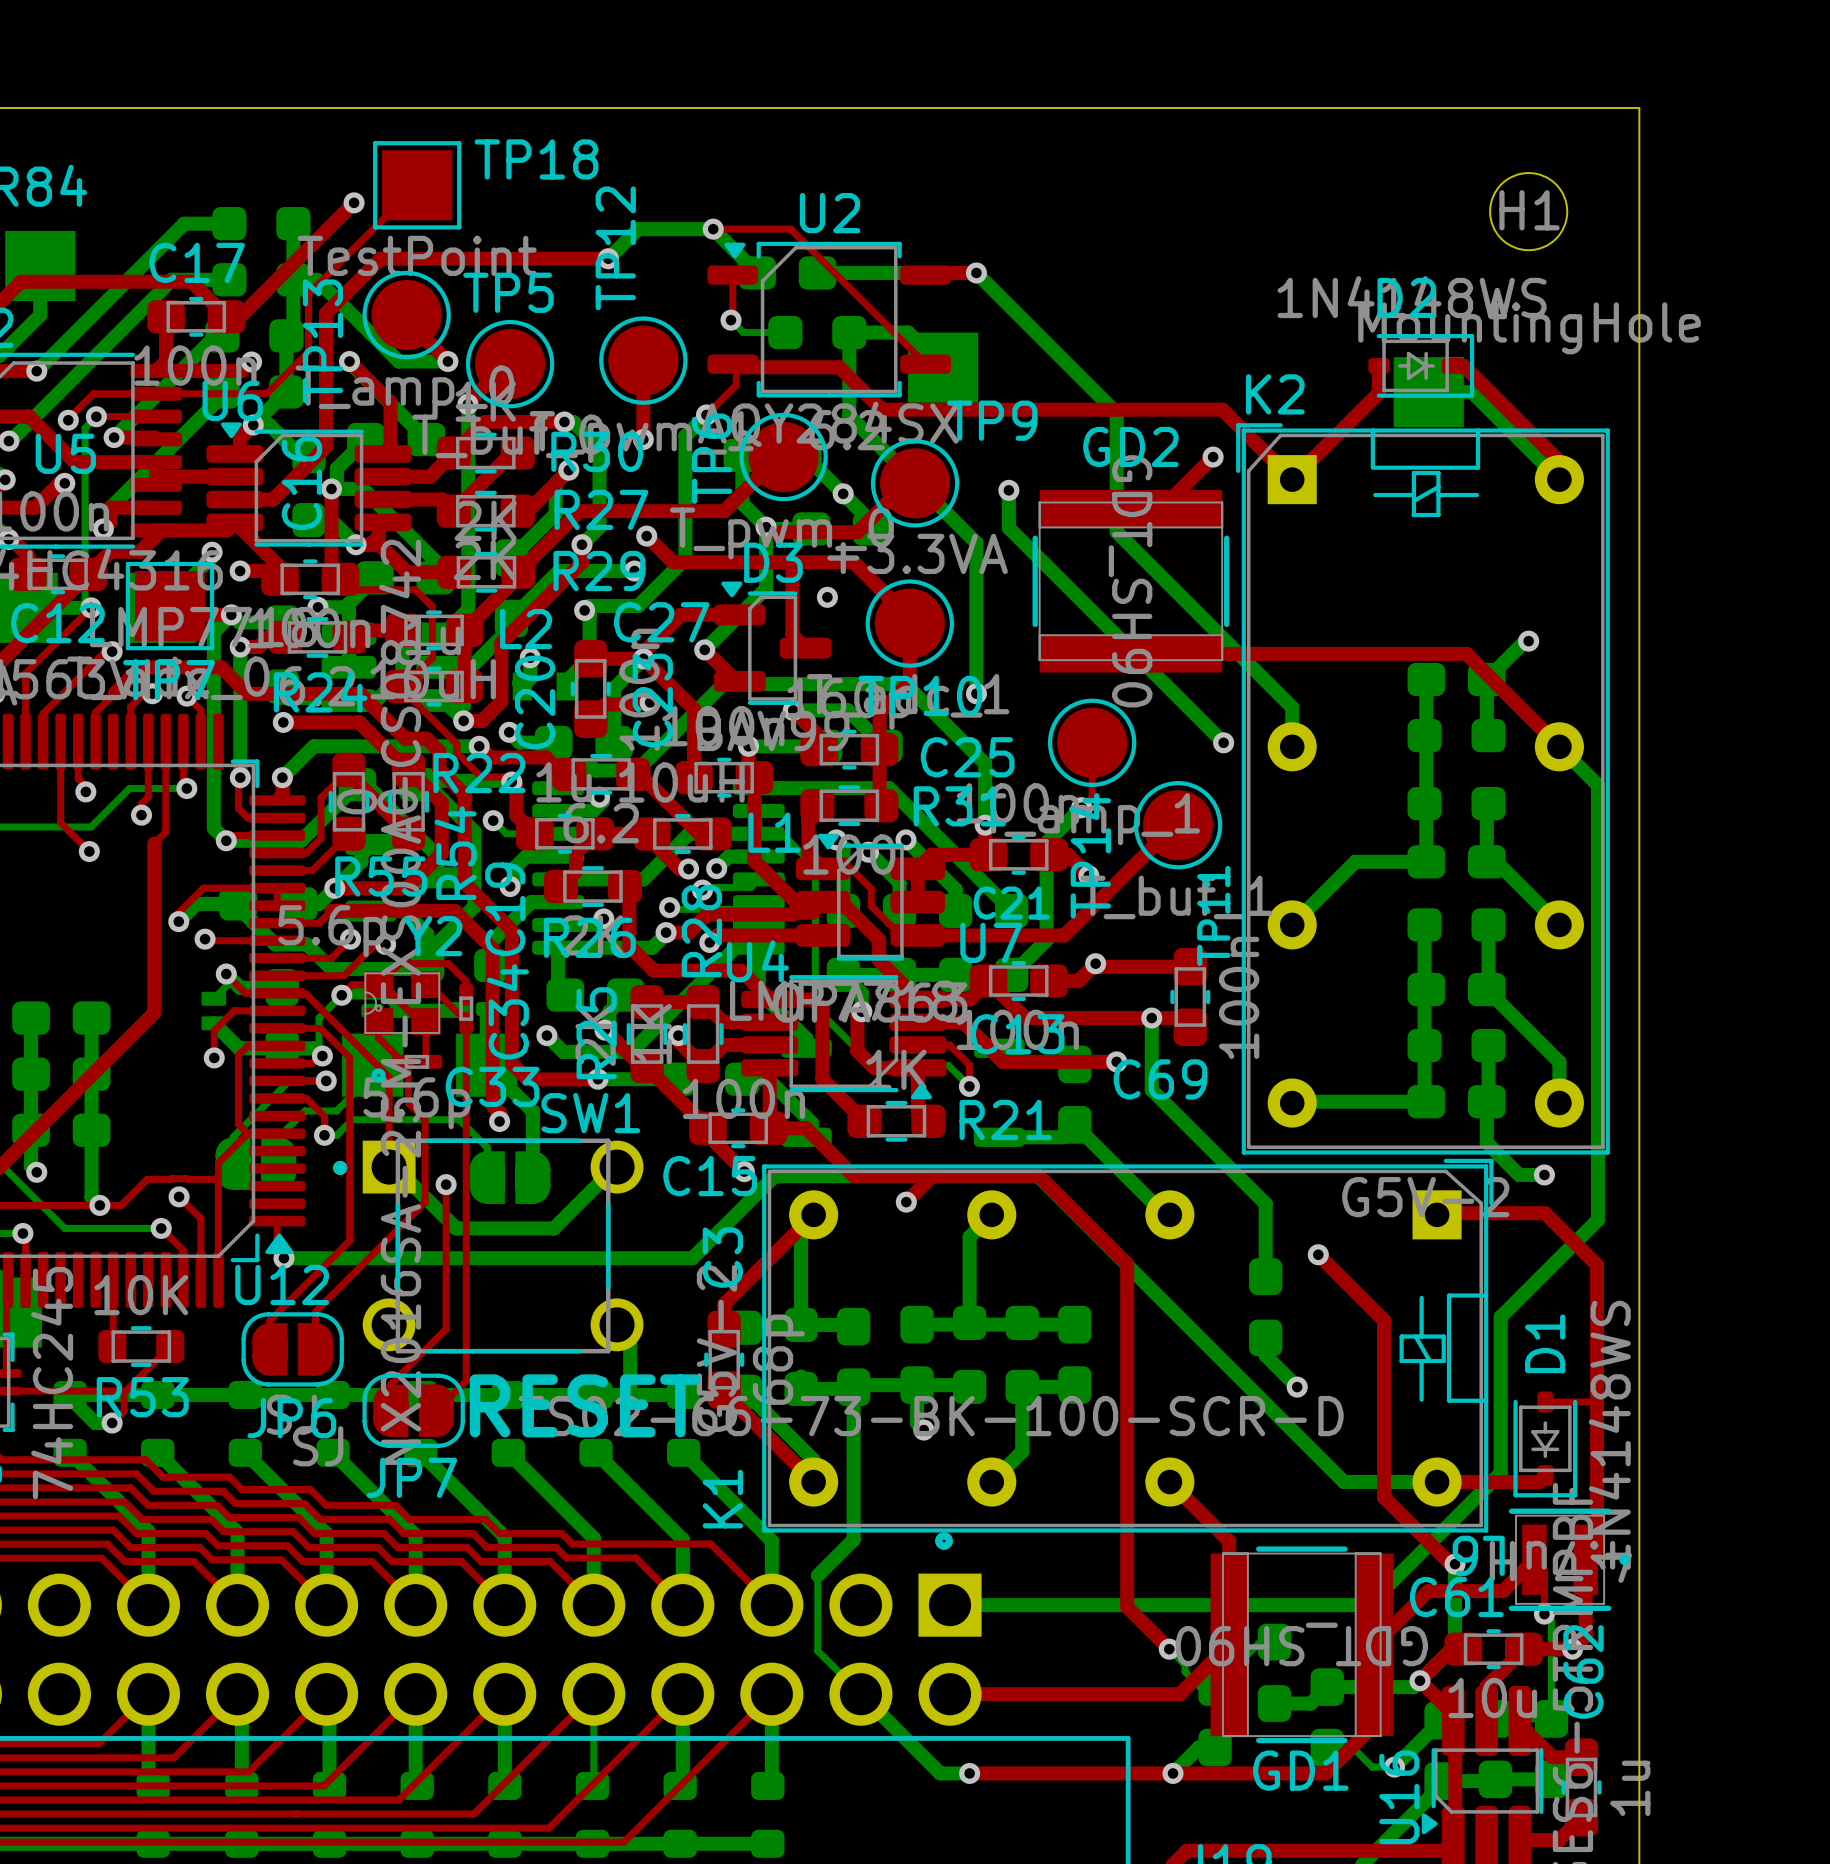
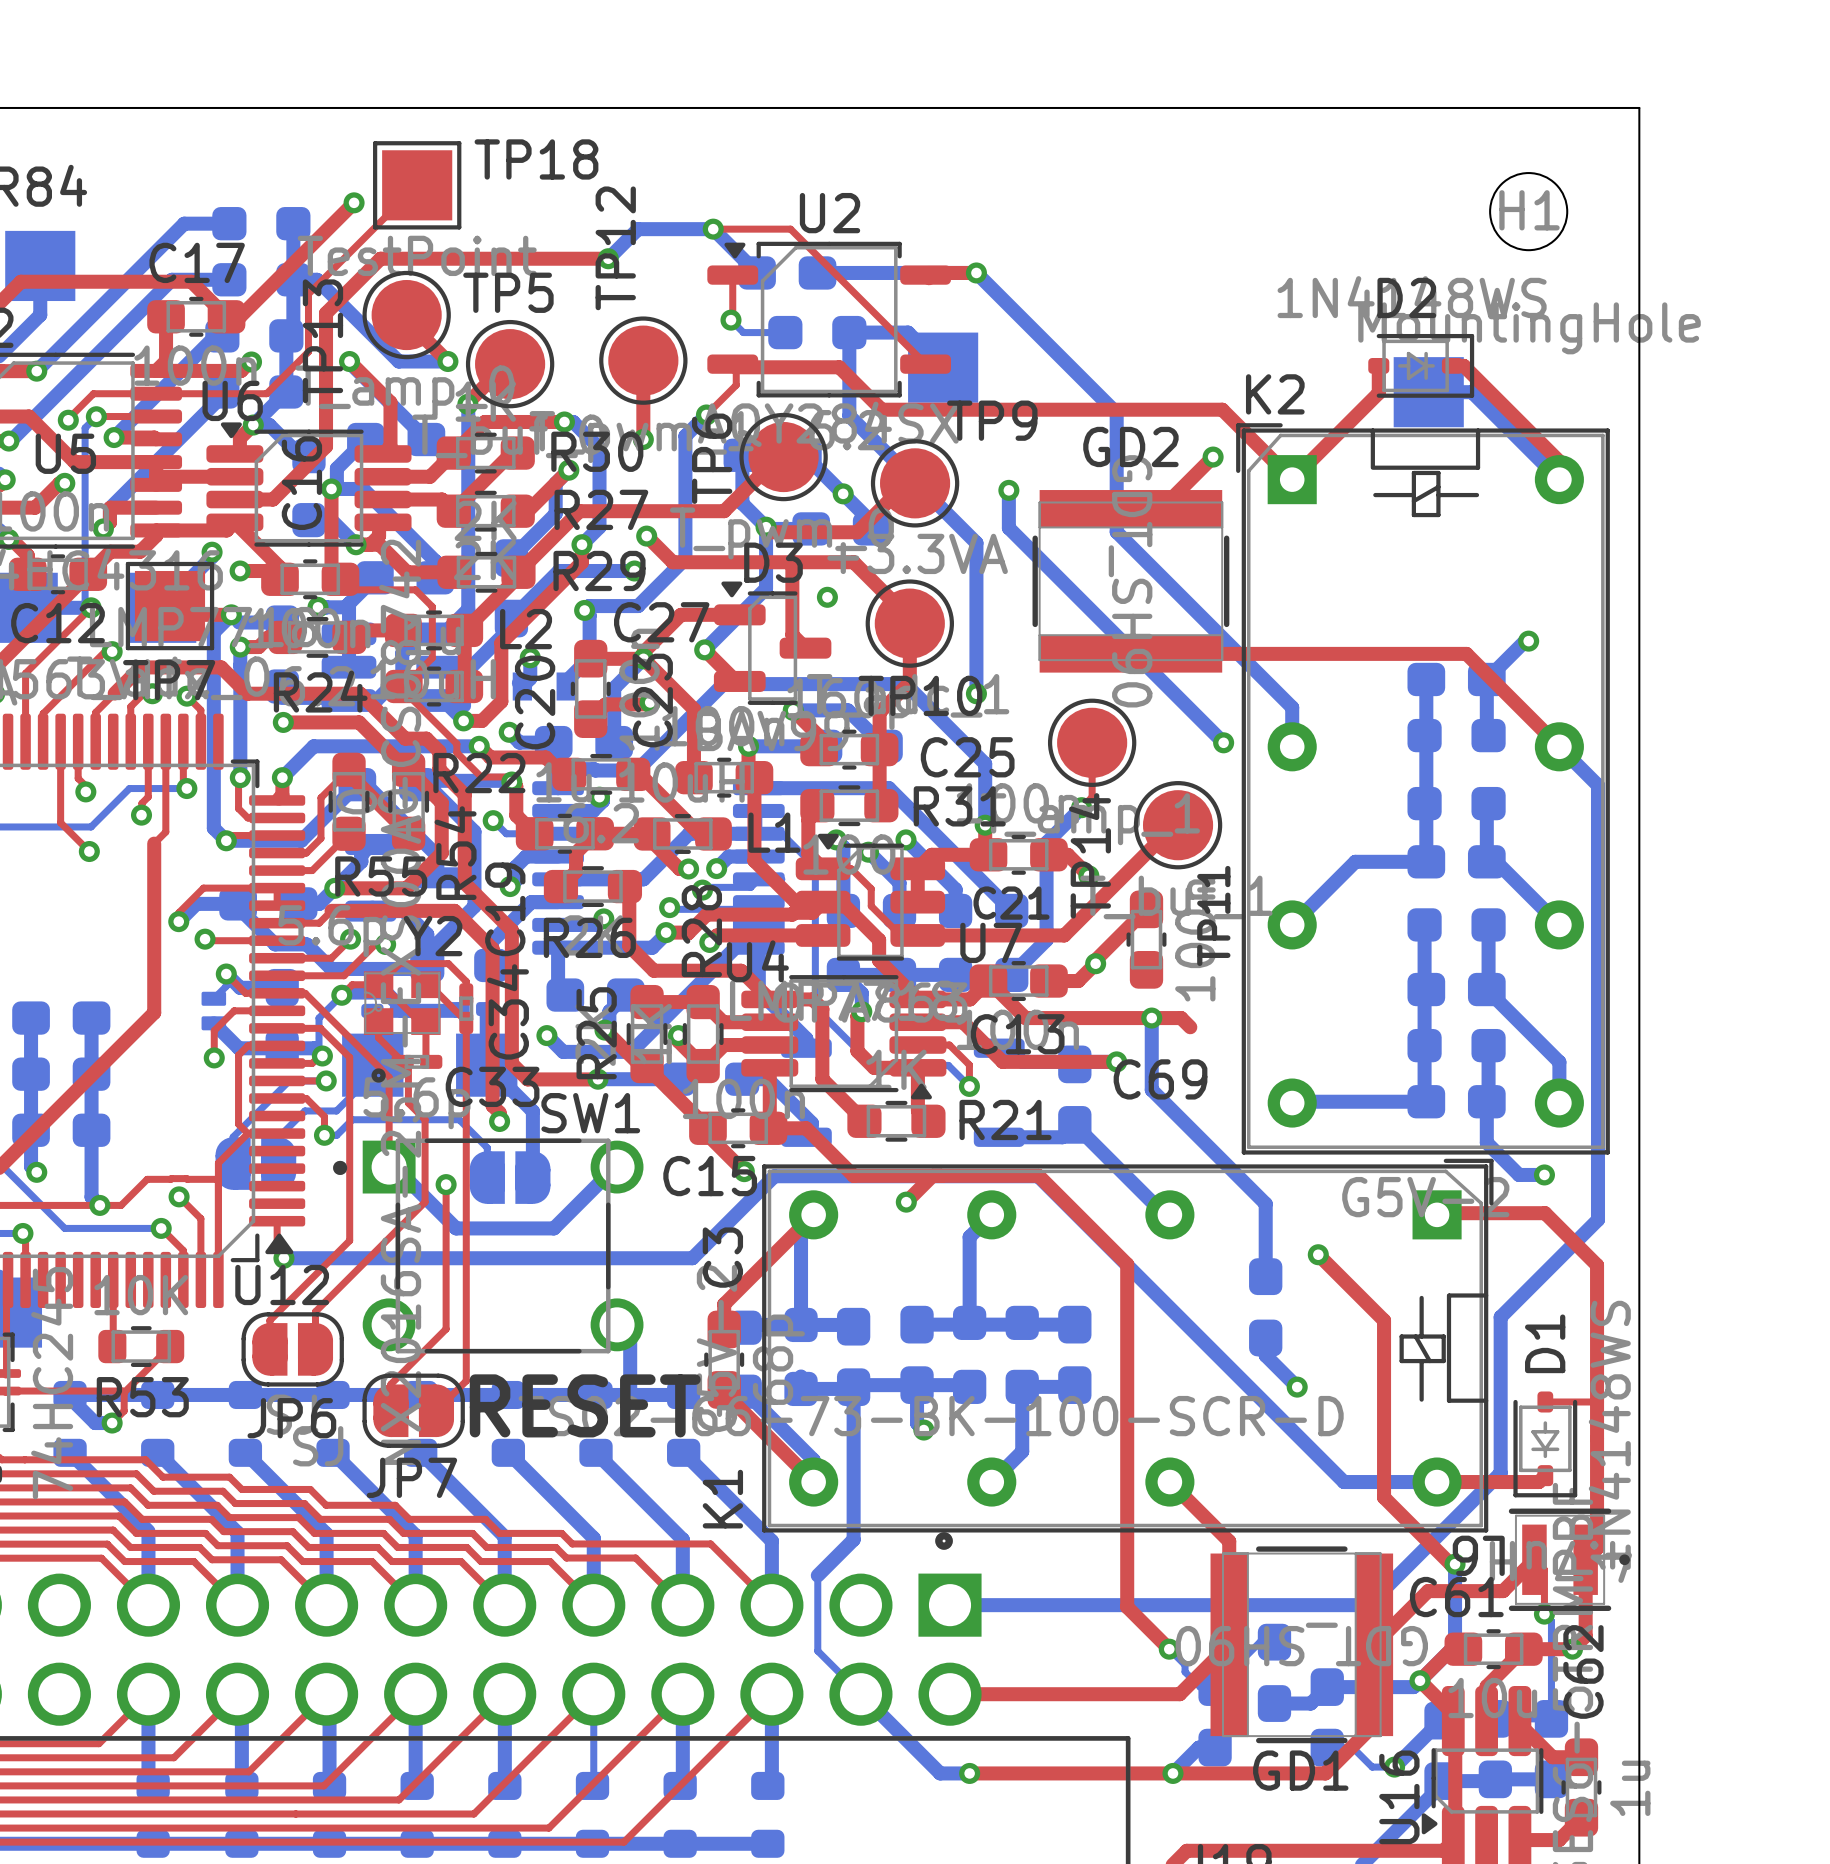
top track: (1095, 963) (1098, 966) (1190, 966) -> (1095, 963) (1095, 960) (1146, 909)
C69 position: (1190, 997) -> (1146, 939)

